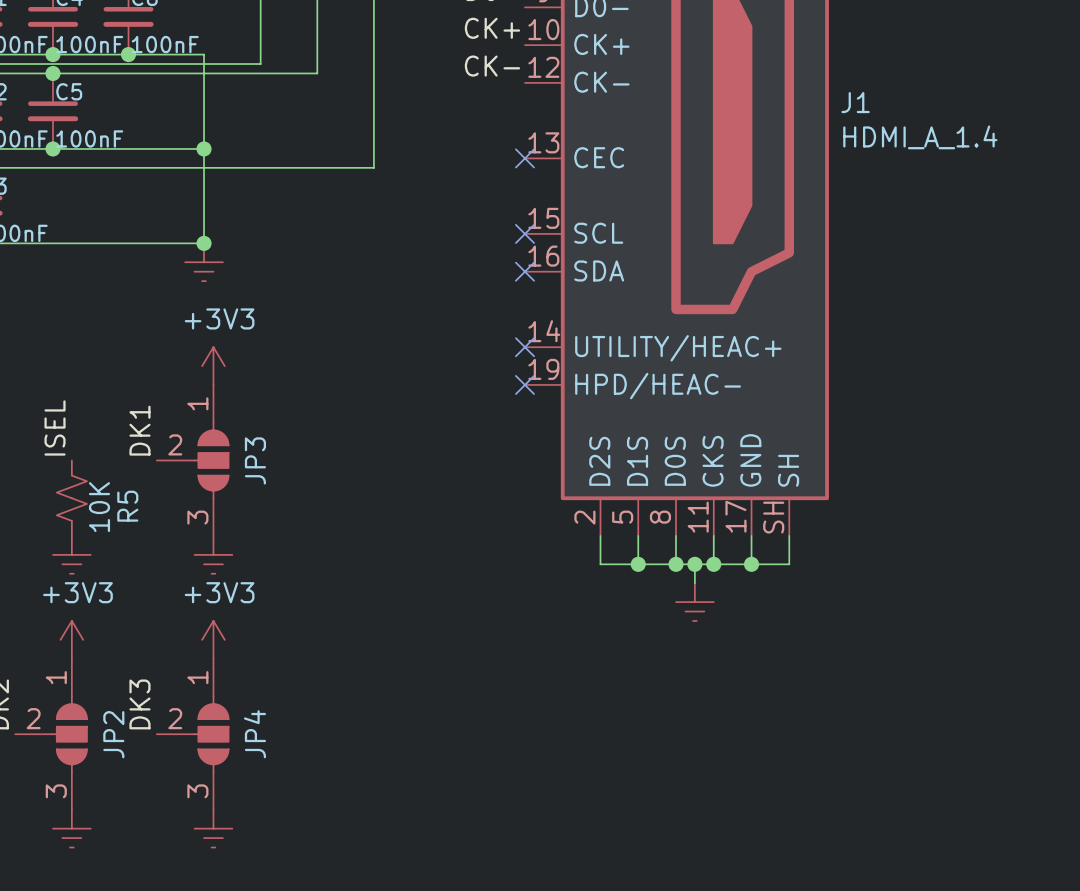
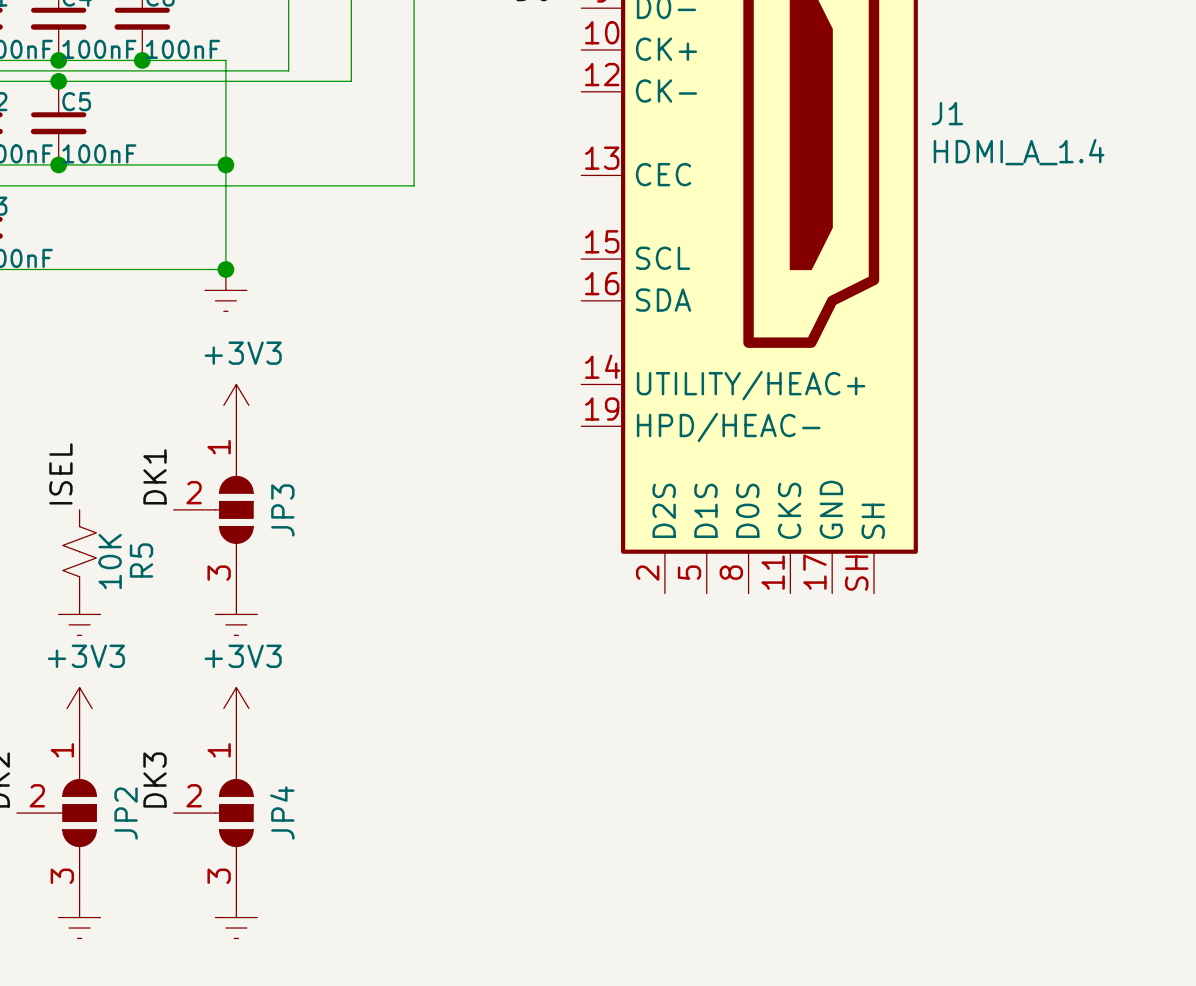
label: CK+ (492, 28) -> none
label: CK- (492, 66) -> none
no-connect mark: (524, 158) -> none
no-connect mark: (524, 233) -> none
no-connect mark: (524, 271) -> none
no-connect mark: (524, 347) -> none
no-connect mark: (524, 384) -> none
wire: (600, 536) (600, 564) (789, 564) (789, 536) -> none
wire: (638, 536) (638, 564) -> none
wire: (676, 536) (676, 564) -> none
wire: (713, 536) (713, 564) -> none
wire: (751, 536) (751, 564) -> none
junction: (638, 564) -> none
junction: (676, 564) -> none
wire: (694, 564) (694, 583) -> none
junction: (694, 564) -> none
junction: (713, 564) -> none
junction: (751, 564) -> none
power symbol: (694, 602) -> none

